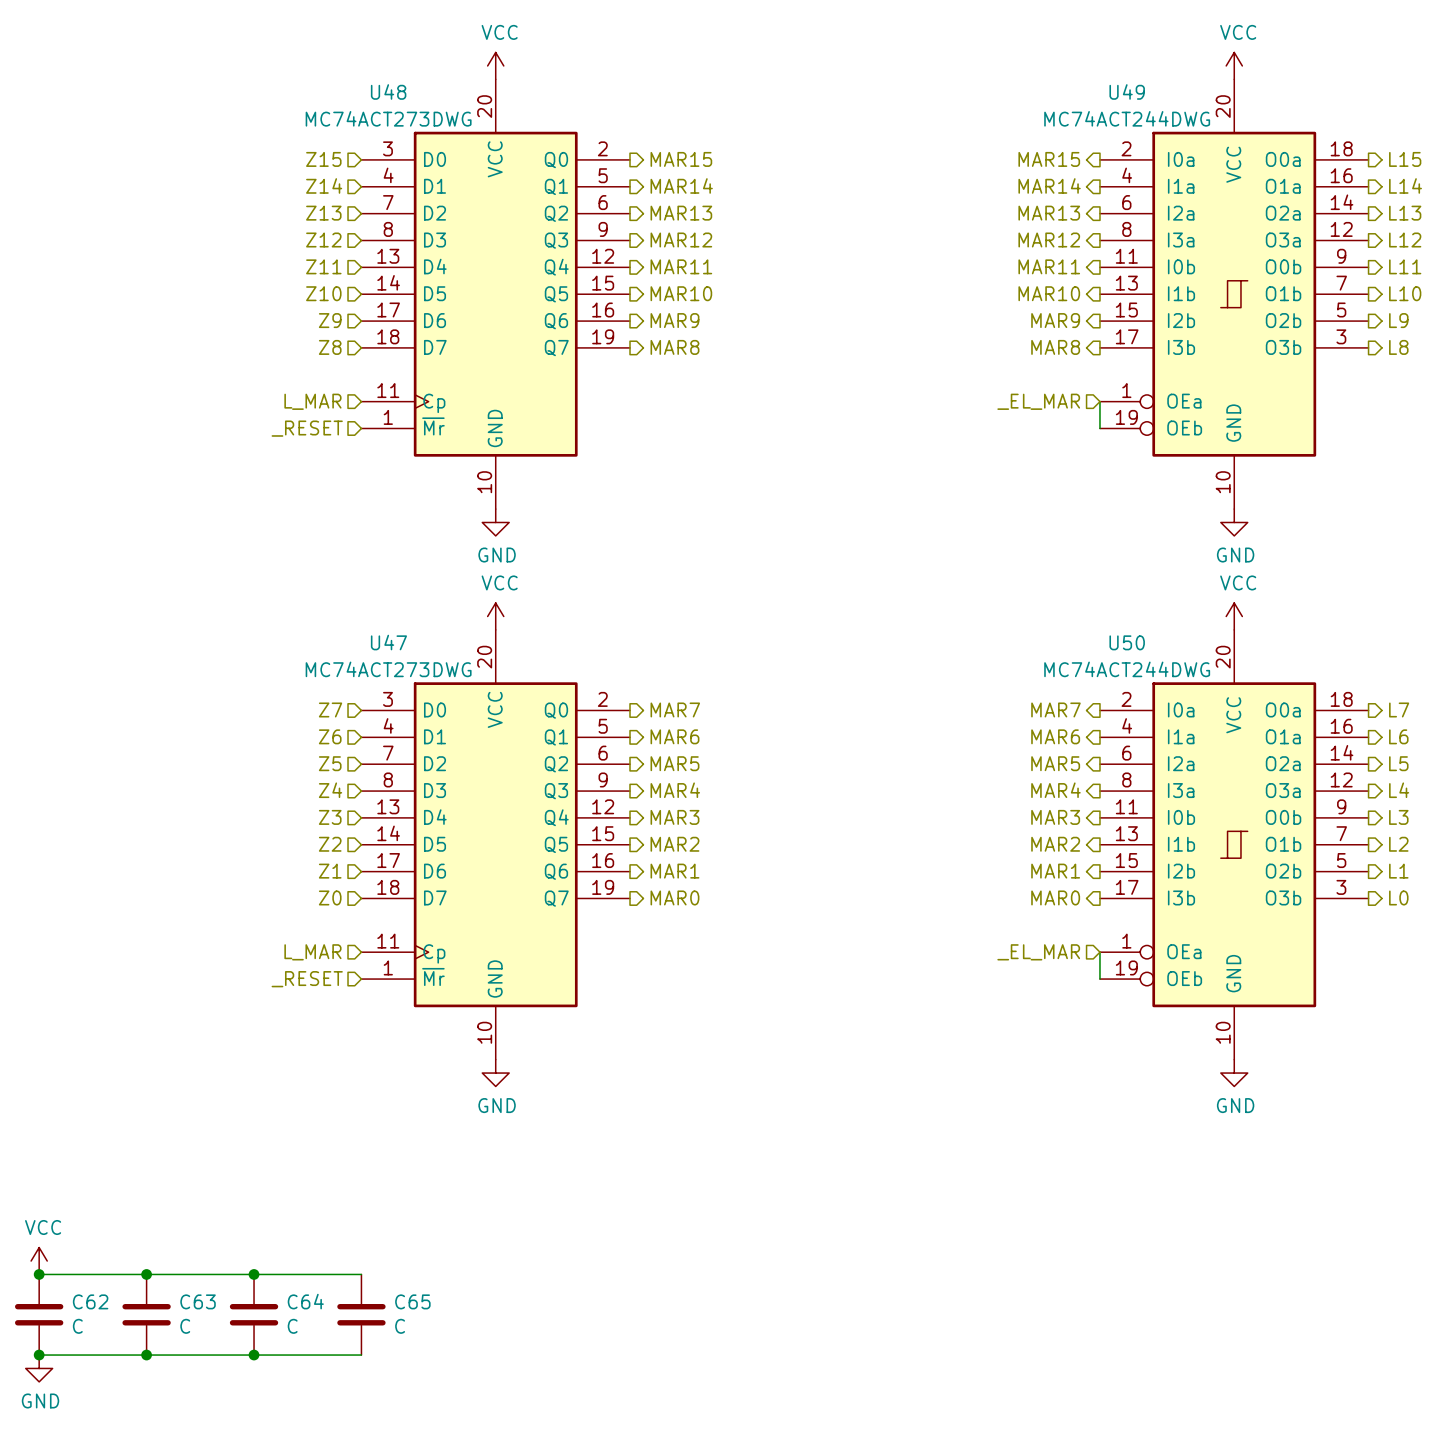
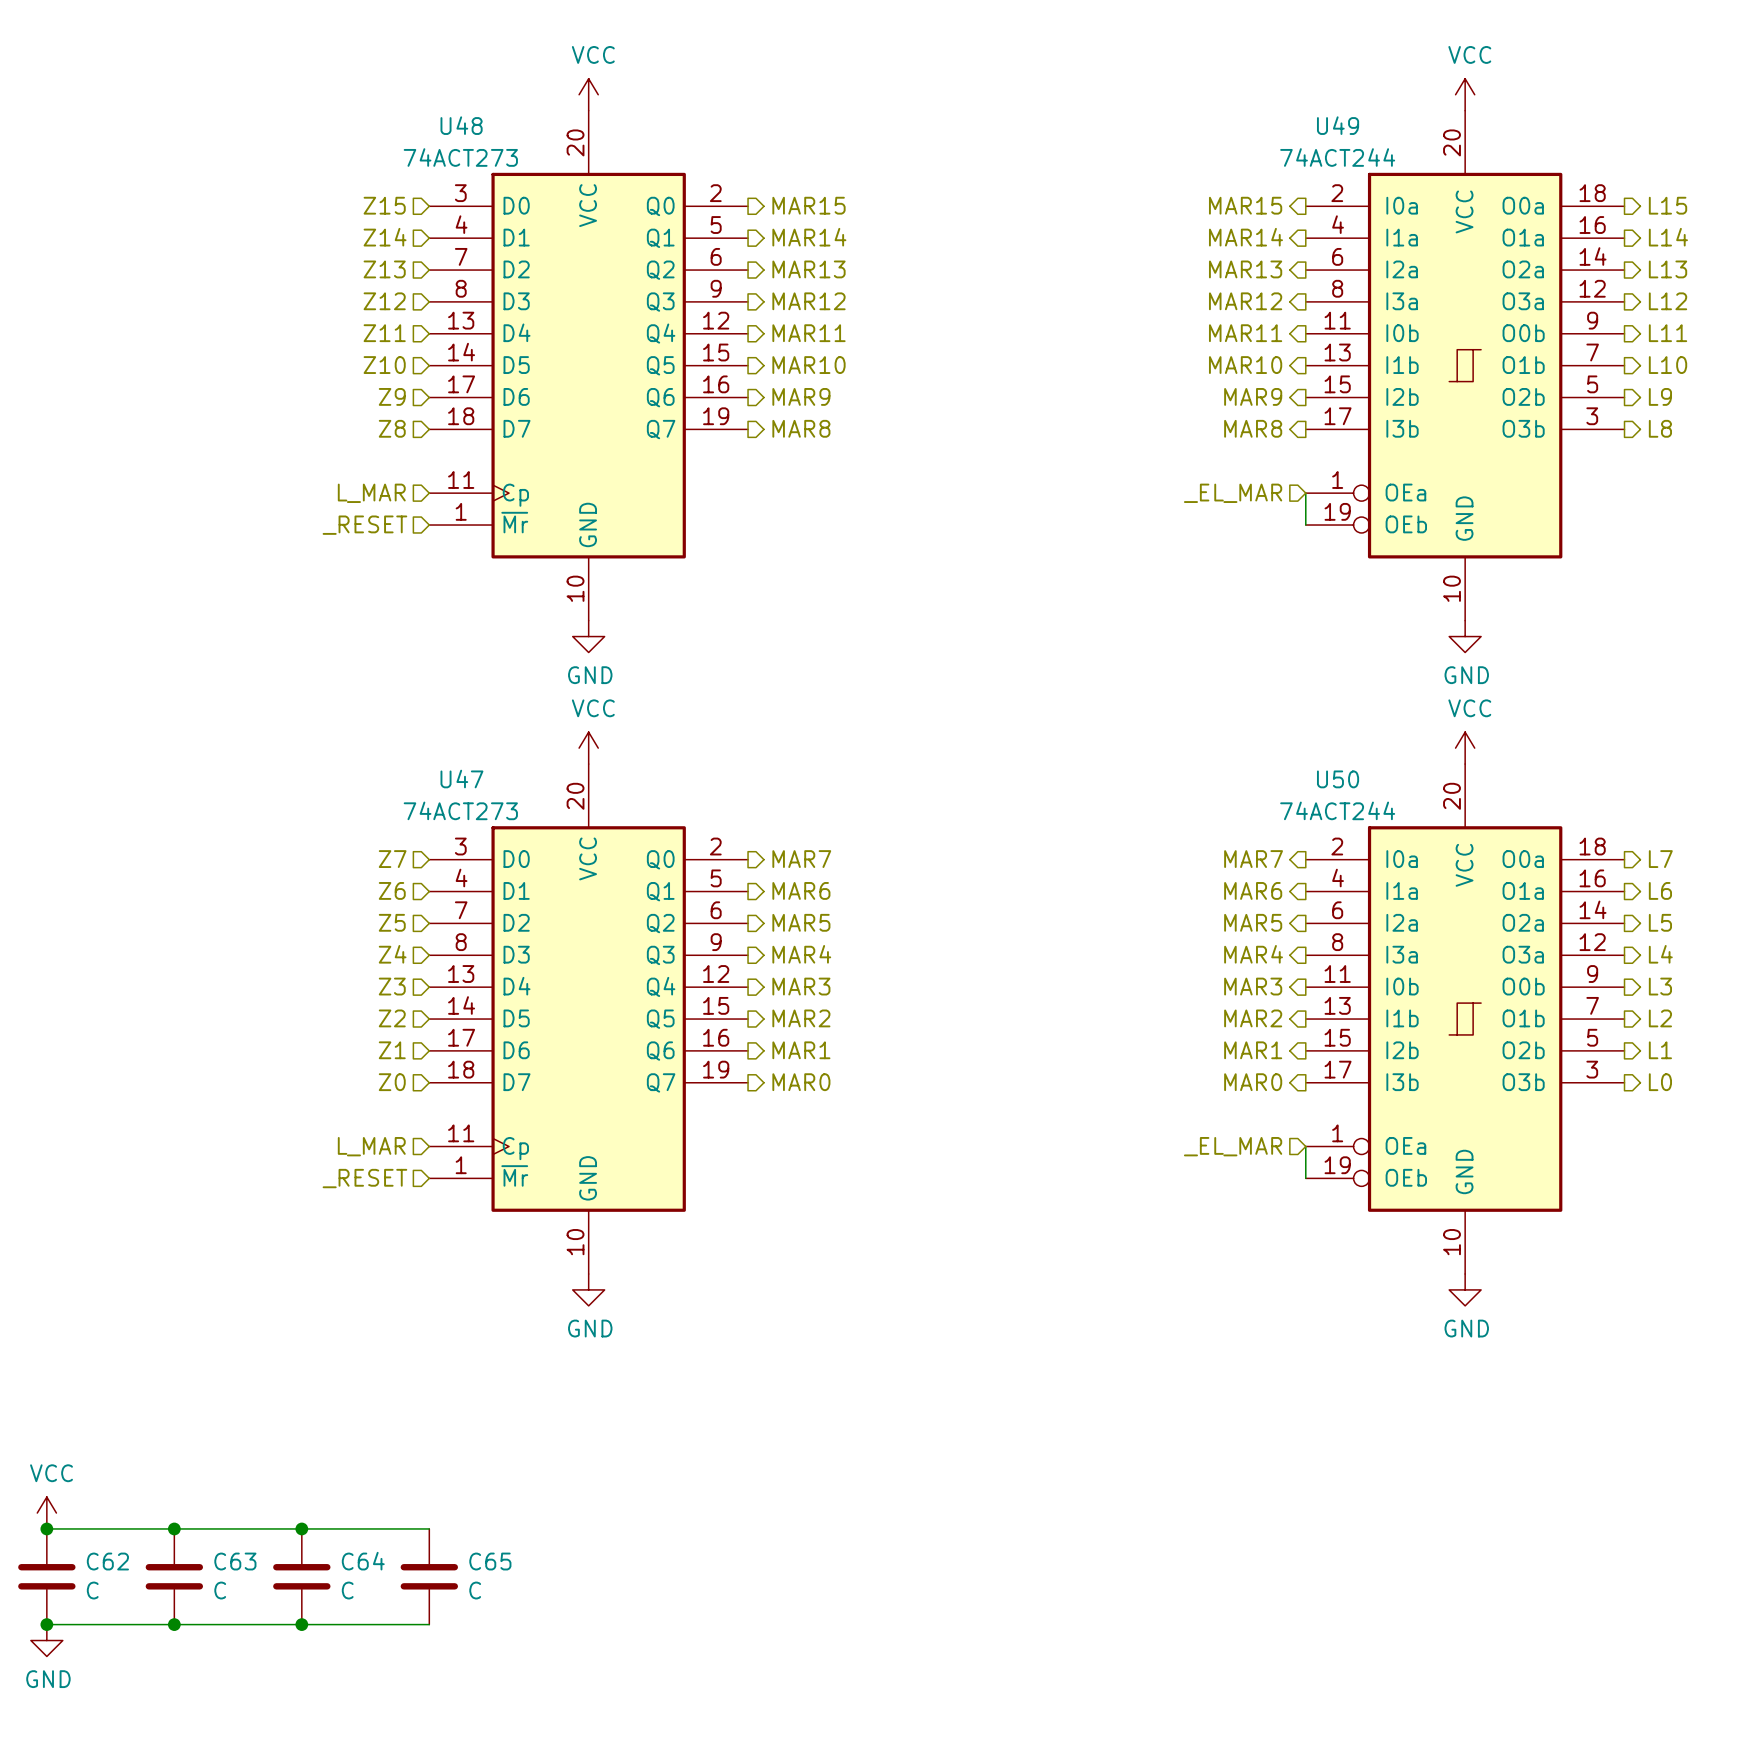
U48 value: MC74ACT273DWG (388, 118) -> 74ACT273 (460, 157)
U49 value: MC74ACT244DWG (1127, 118) -> 74ACT244 (1337, 157)
U47 value: MC74ACT273DWG (388, 669) -> 74ACT273 (460, 810)
U50 value: MC74ACT244DWG (1127, 669) -> 74ACT244 (1337, 810)

